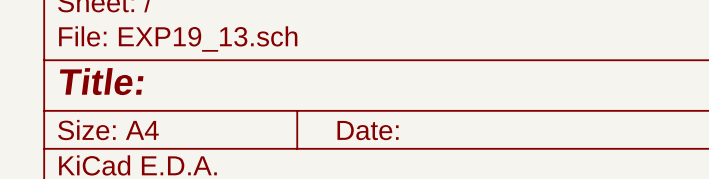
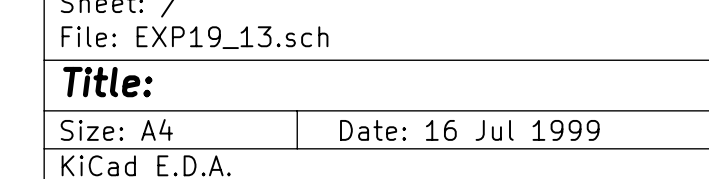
title block: Date: (368, 130) -> Date: 16 Jul 1999 (469, 130)

